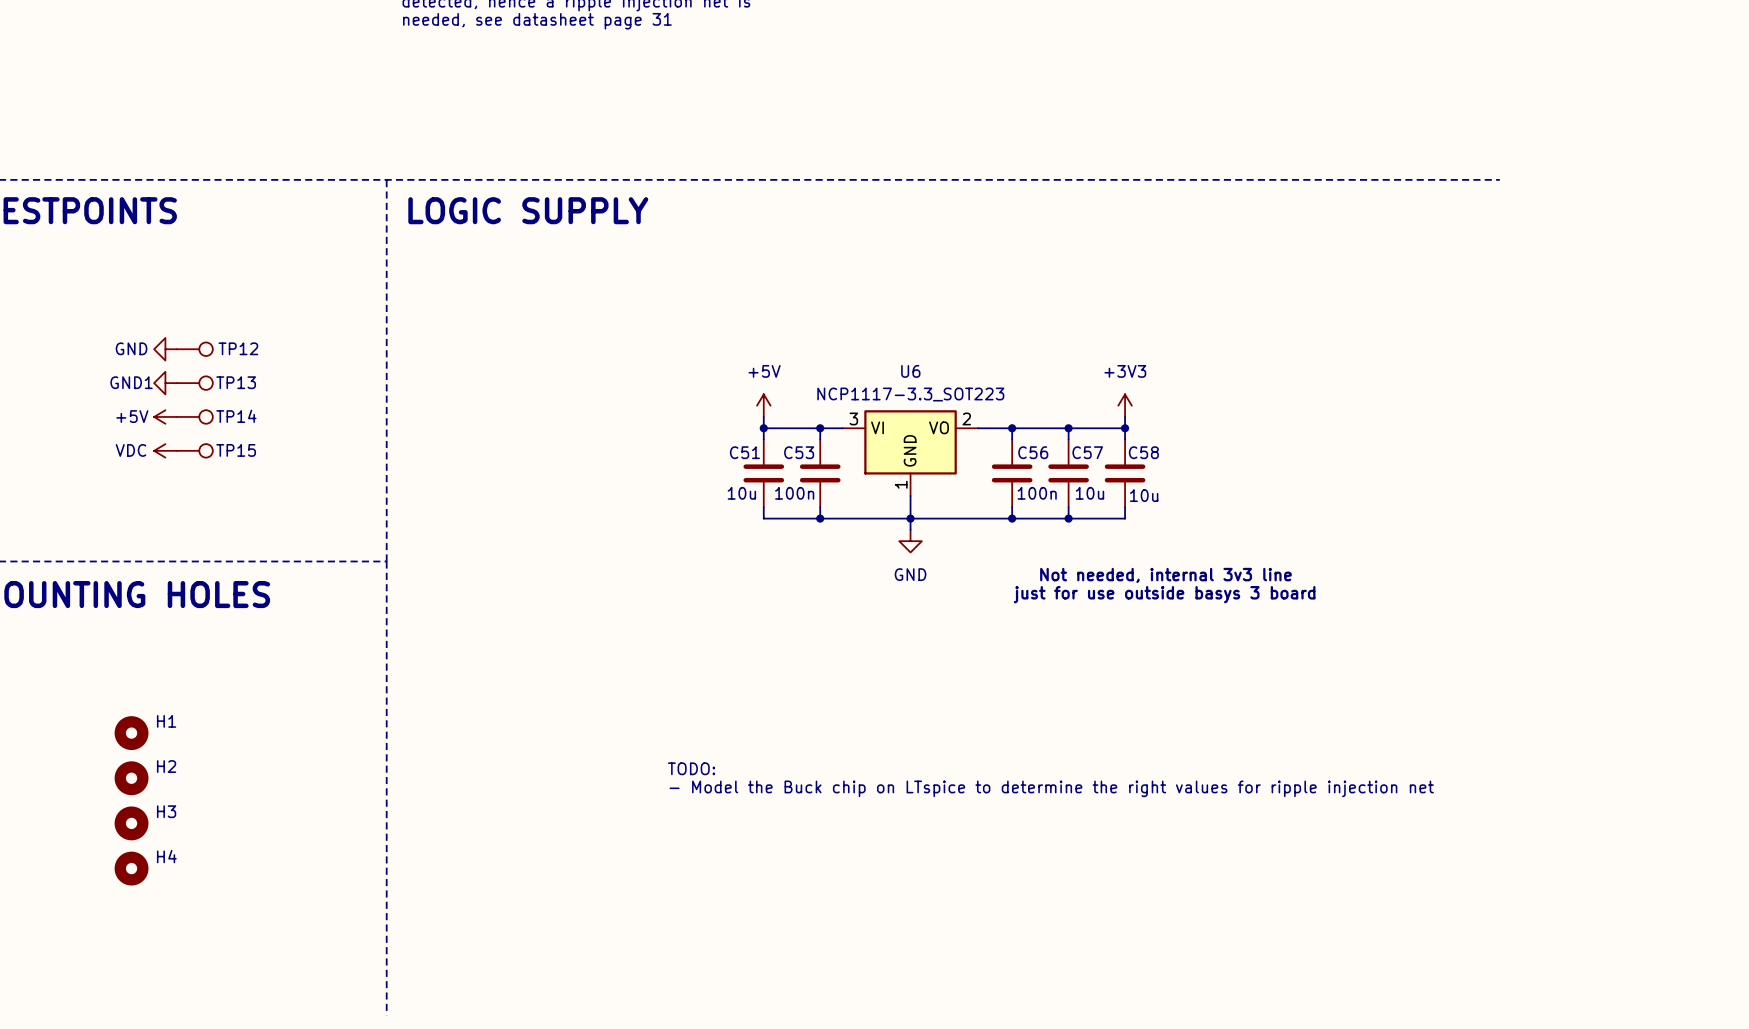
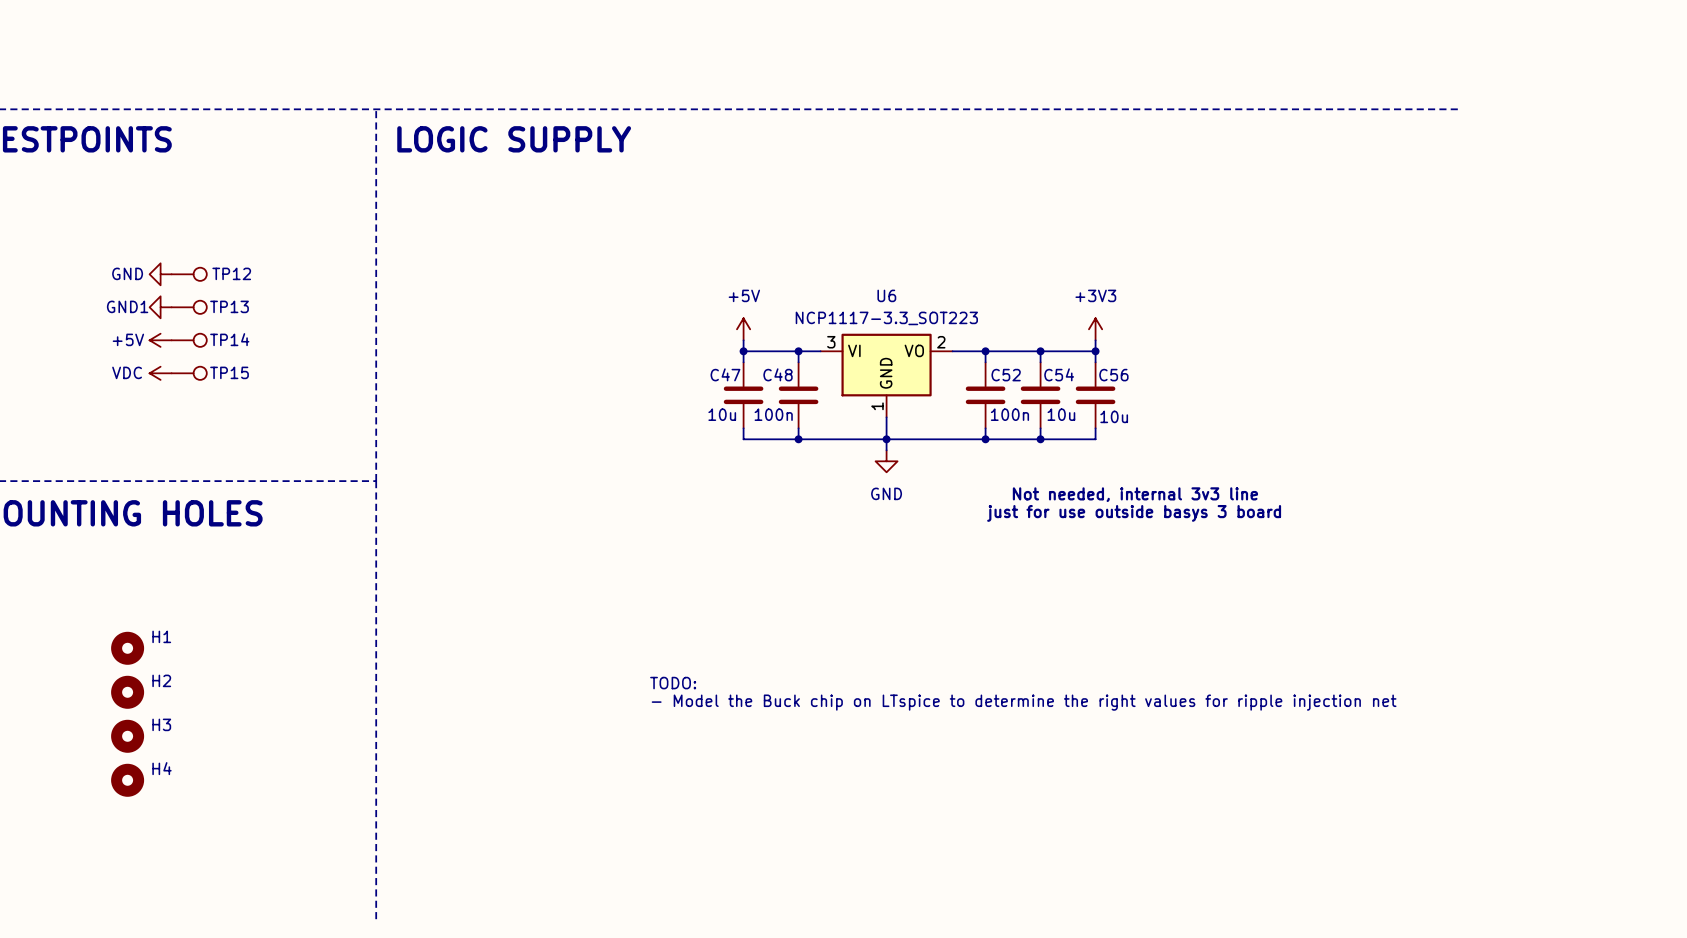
C51 name: C51 (744, 452) -> C47 (725, 374)
C53 name: C53 (799, 452) -> C48 (778, 374)
C56 name: C56 (1033, 452) -> C52 (1006, 375)
C57 name: C57 (1087, 452) -> C54 (1059, 374)
C58 name: C58 (1143, 452) -> C56 (1113, 375)

